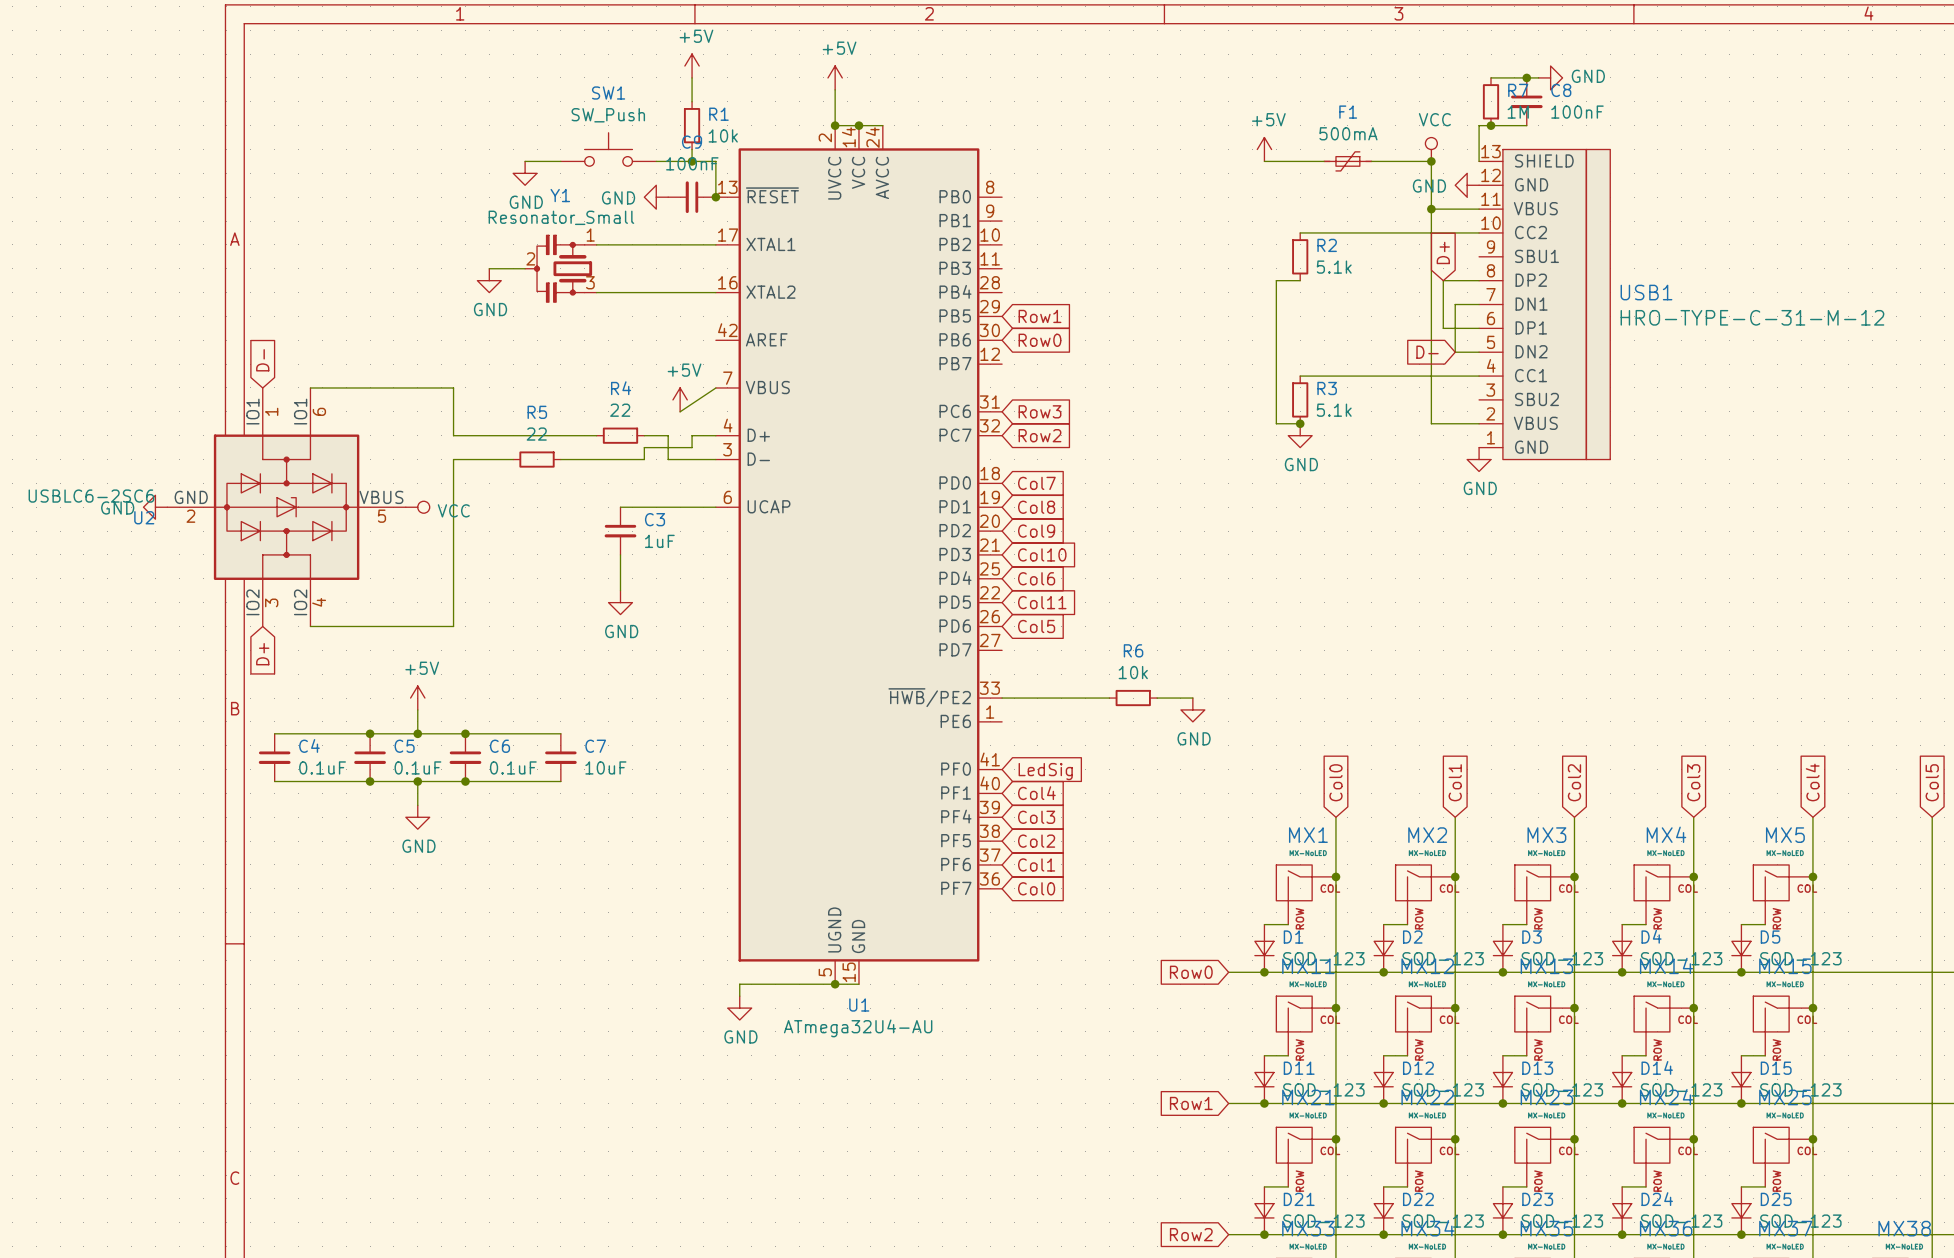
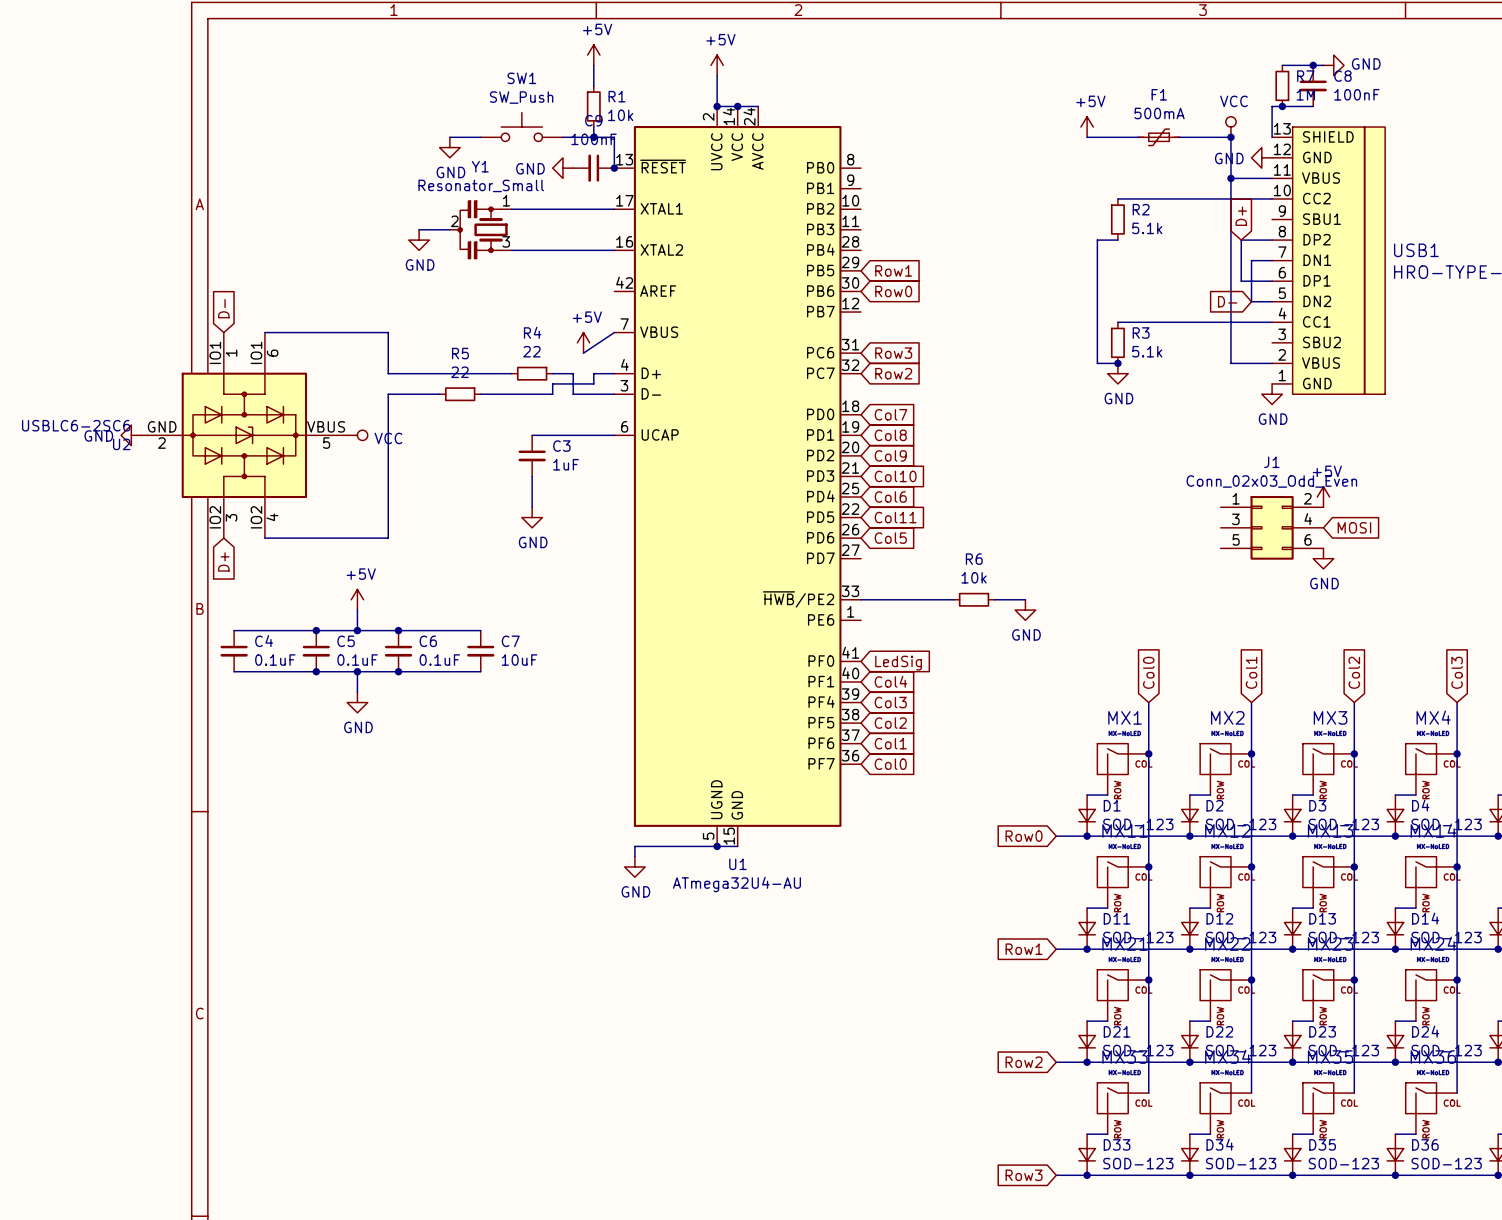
power symbol: none -> +5V (1323, 497)
J1: none -> Conn_02x03_Odd_Even (1272, 527)
global label: none -> MOSI (1354, 527)
power symbol: none -> GND (1323, 558)

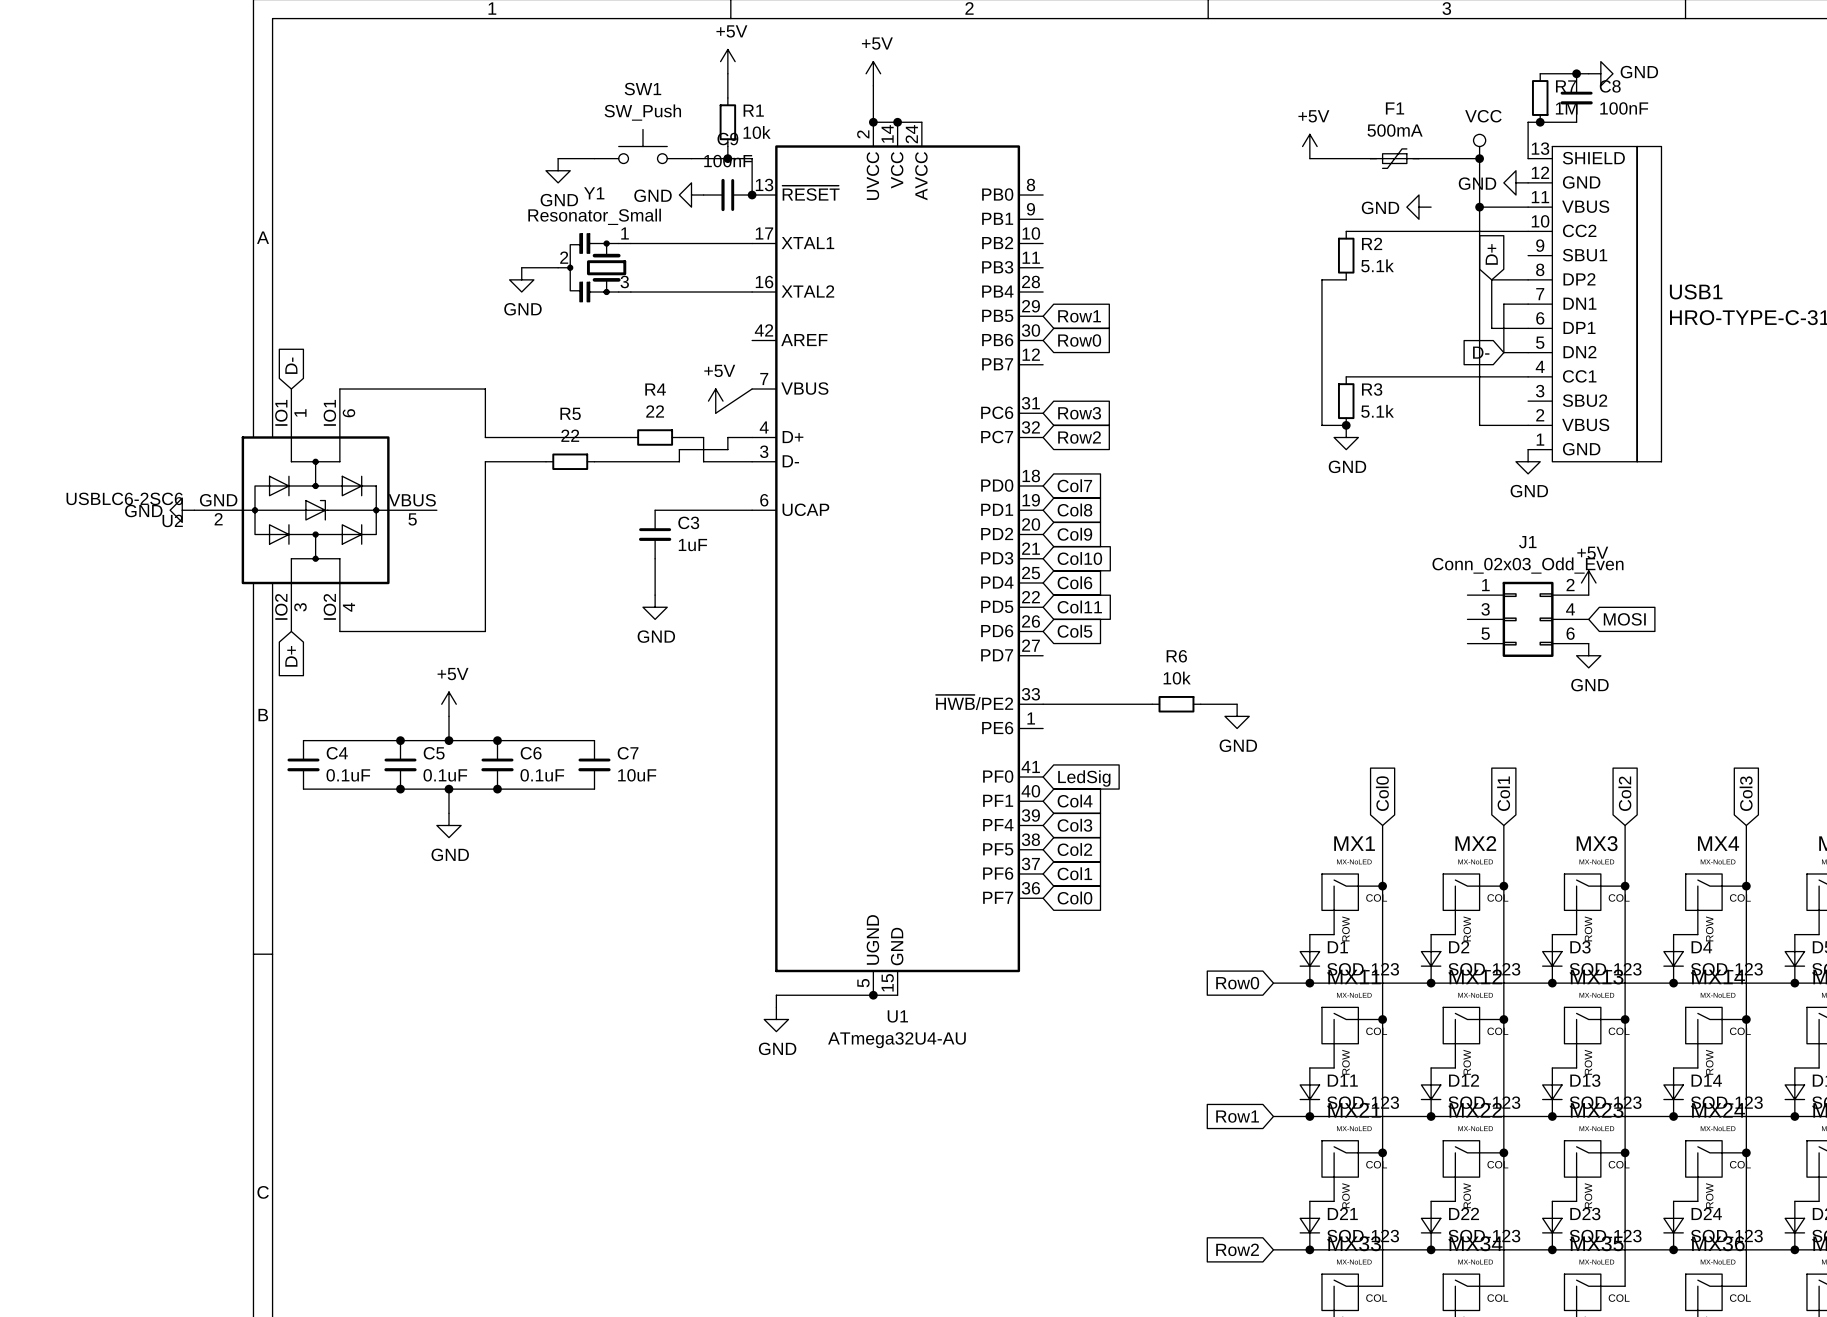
power symbol: none -> GND (1418, 207)
power symbol: VCC (357, 435) -> none

